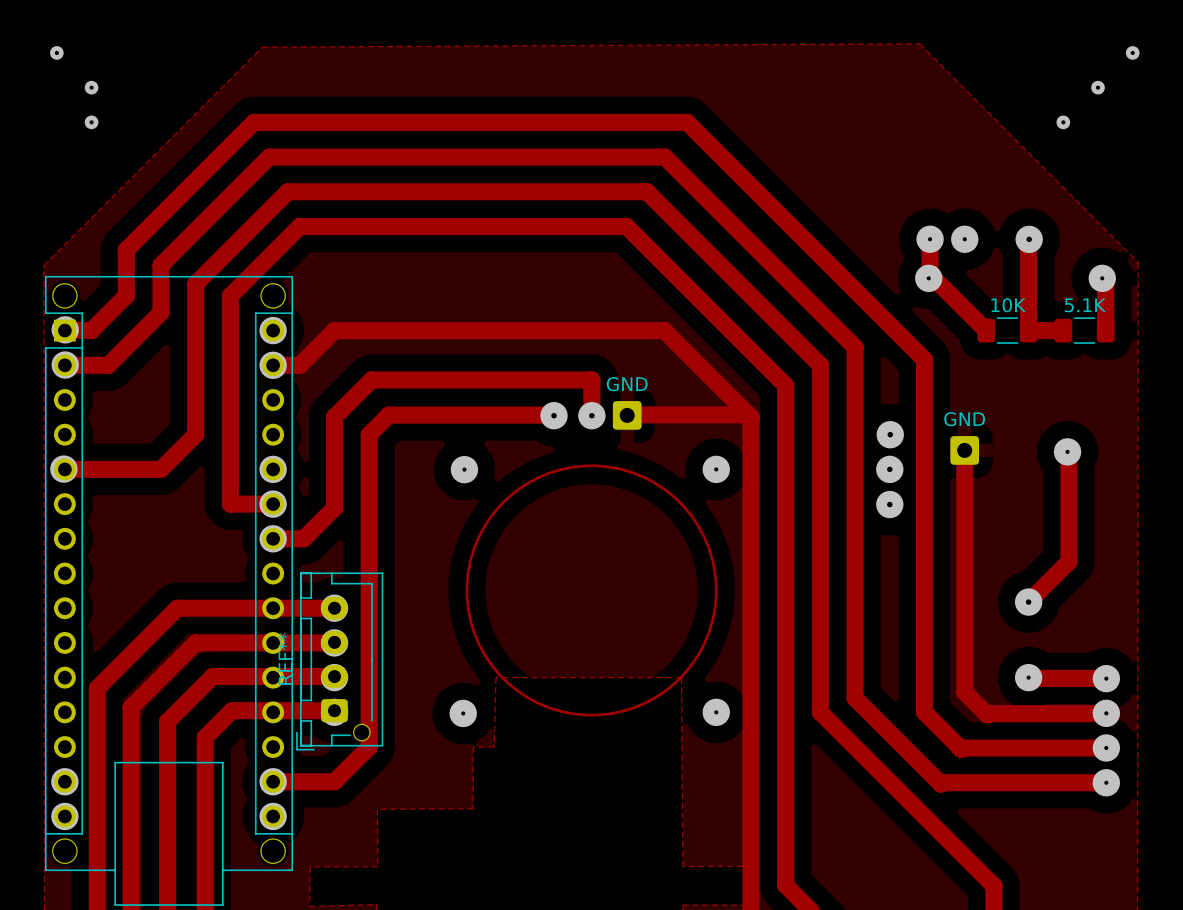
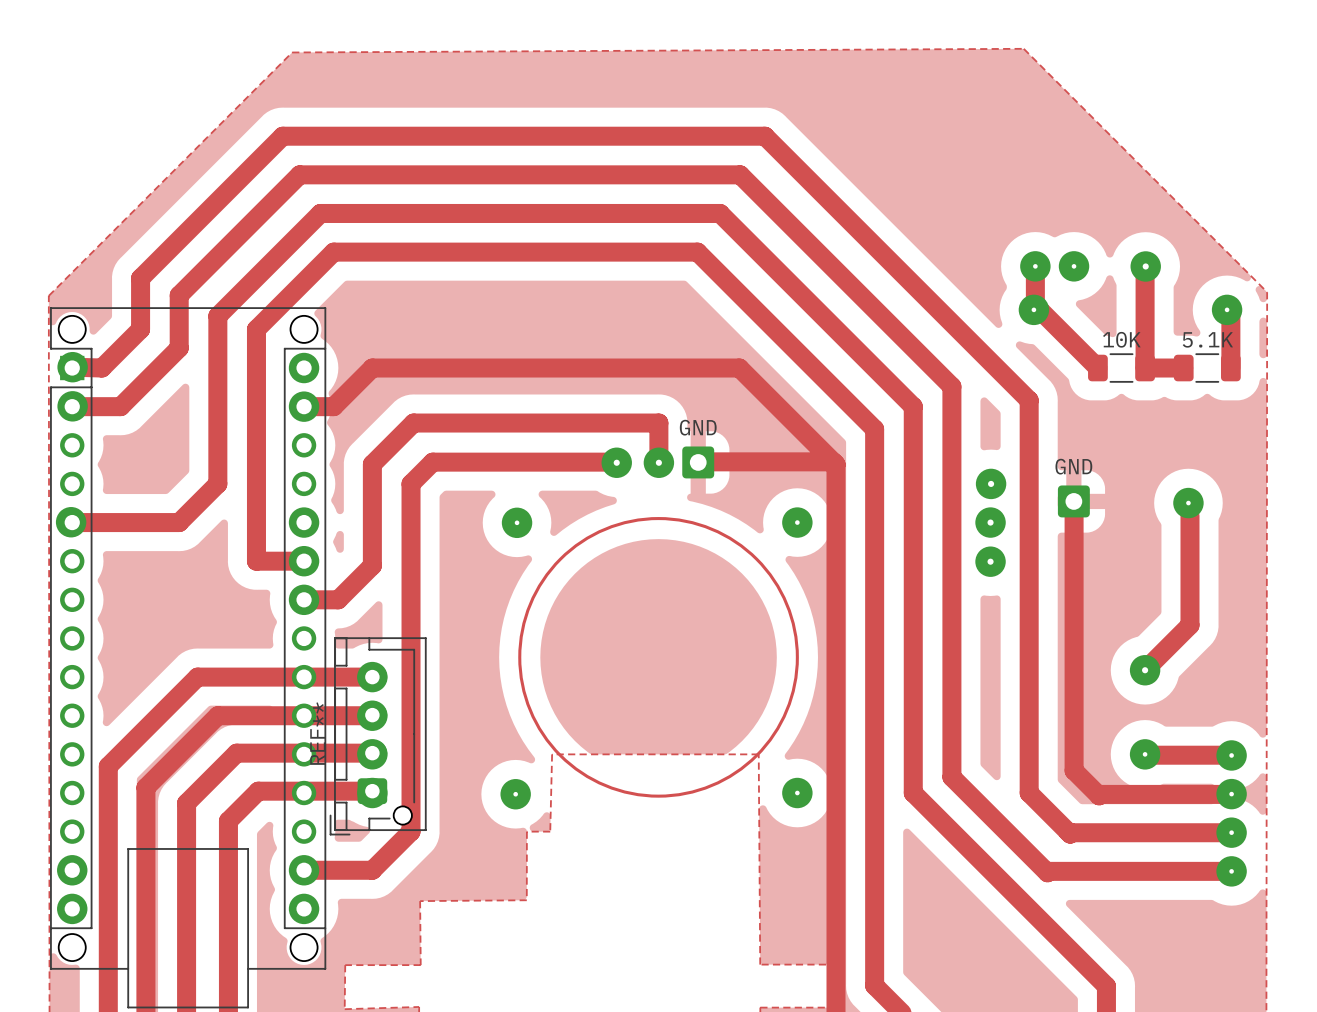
via: (56, 52) -> none
via: (1132, 52) -> none
via: (91, 87) -> none
via: (1098, 87) -> none
via: (91, 122) -> none
via: (1063, 122) -> none

